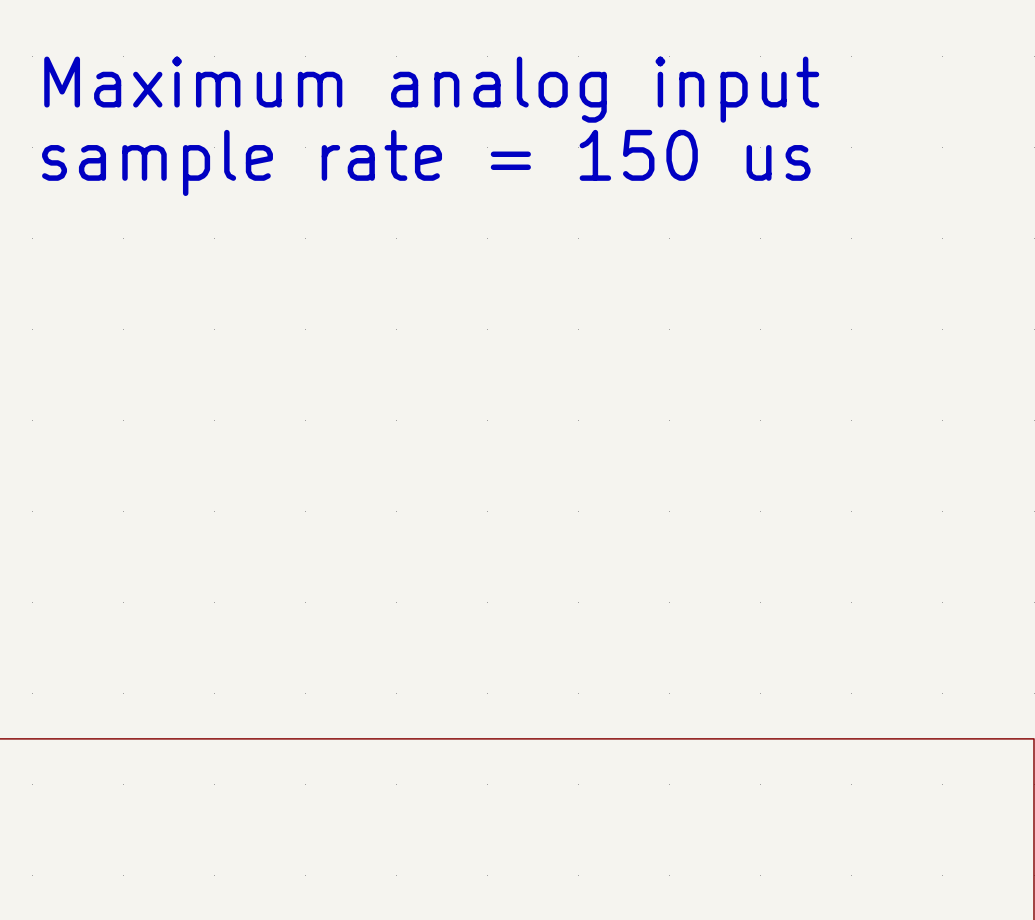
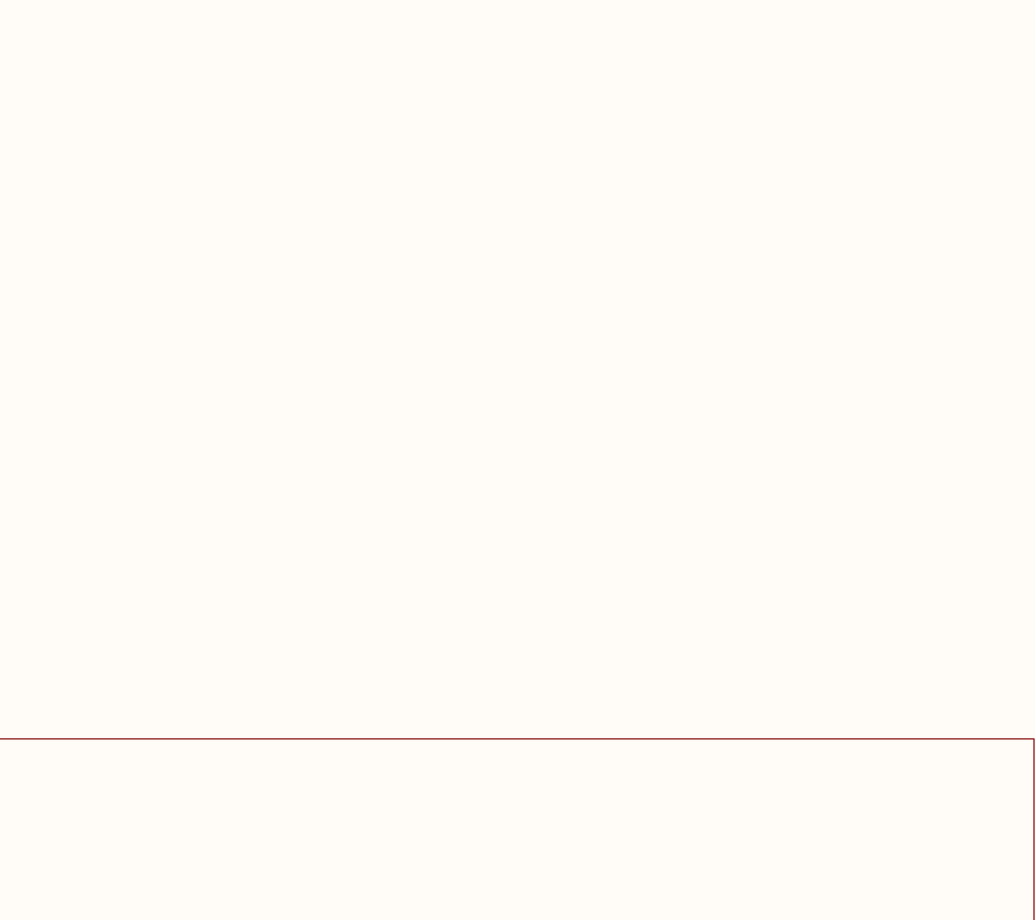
text: Maximum analog input (431, 89) -> none
text: sample rate = 150 us (426, 162) -> none

